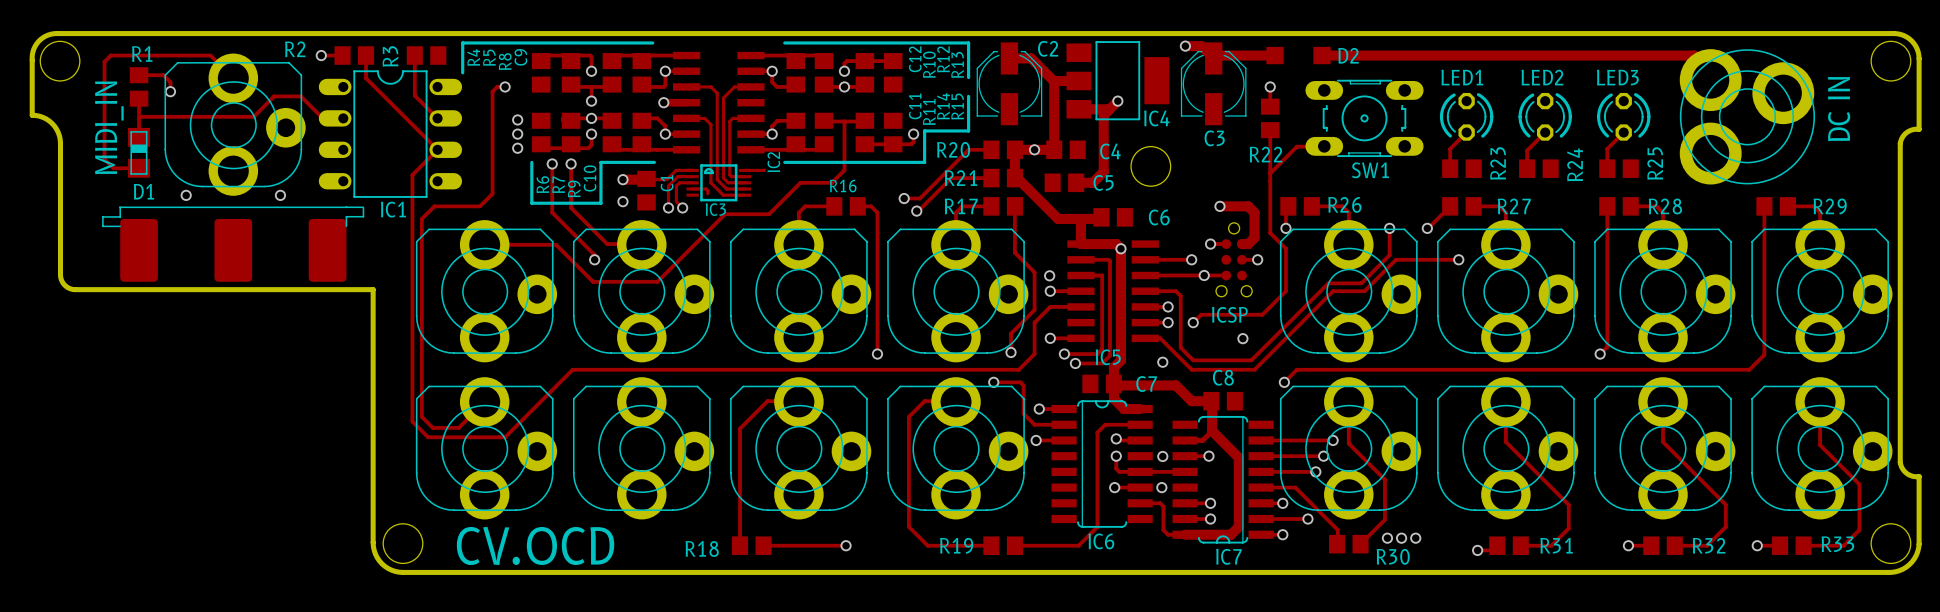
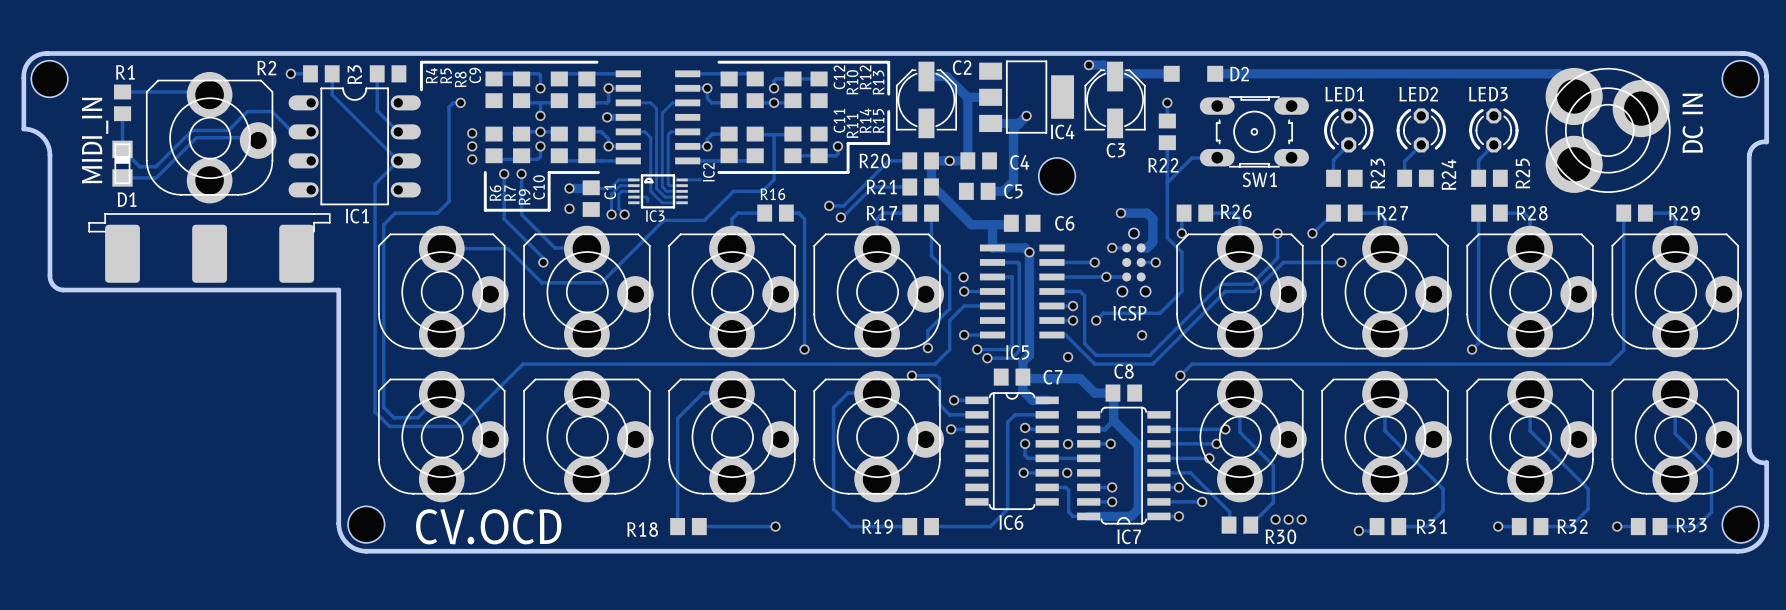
track: (163, 75) (170, 82) (170, 91) -> (145, 91) (206, 91)
track: (230, 75) (210, 55) (110, 55) (104, 61) (104, 159) (113, 168) (138, 168) -> (258, 140) (255, 137) (196, 137) (156, 177) (122, 177)
via: (170, 91) -> none
track: (214, 116) (140, 116) (139, 118) -> (192, 130) (155, 166) (139, 166) (122, 149)
via: (186, 195) -> none
via: (280, 195) -> none

